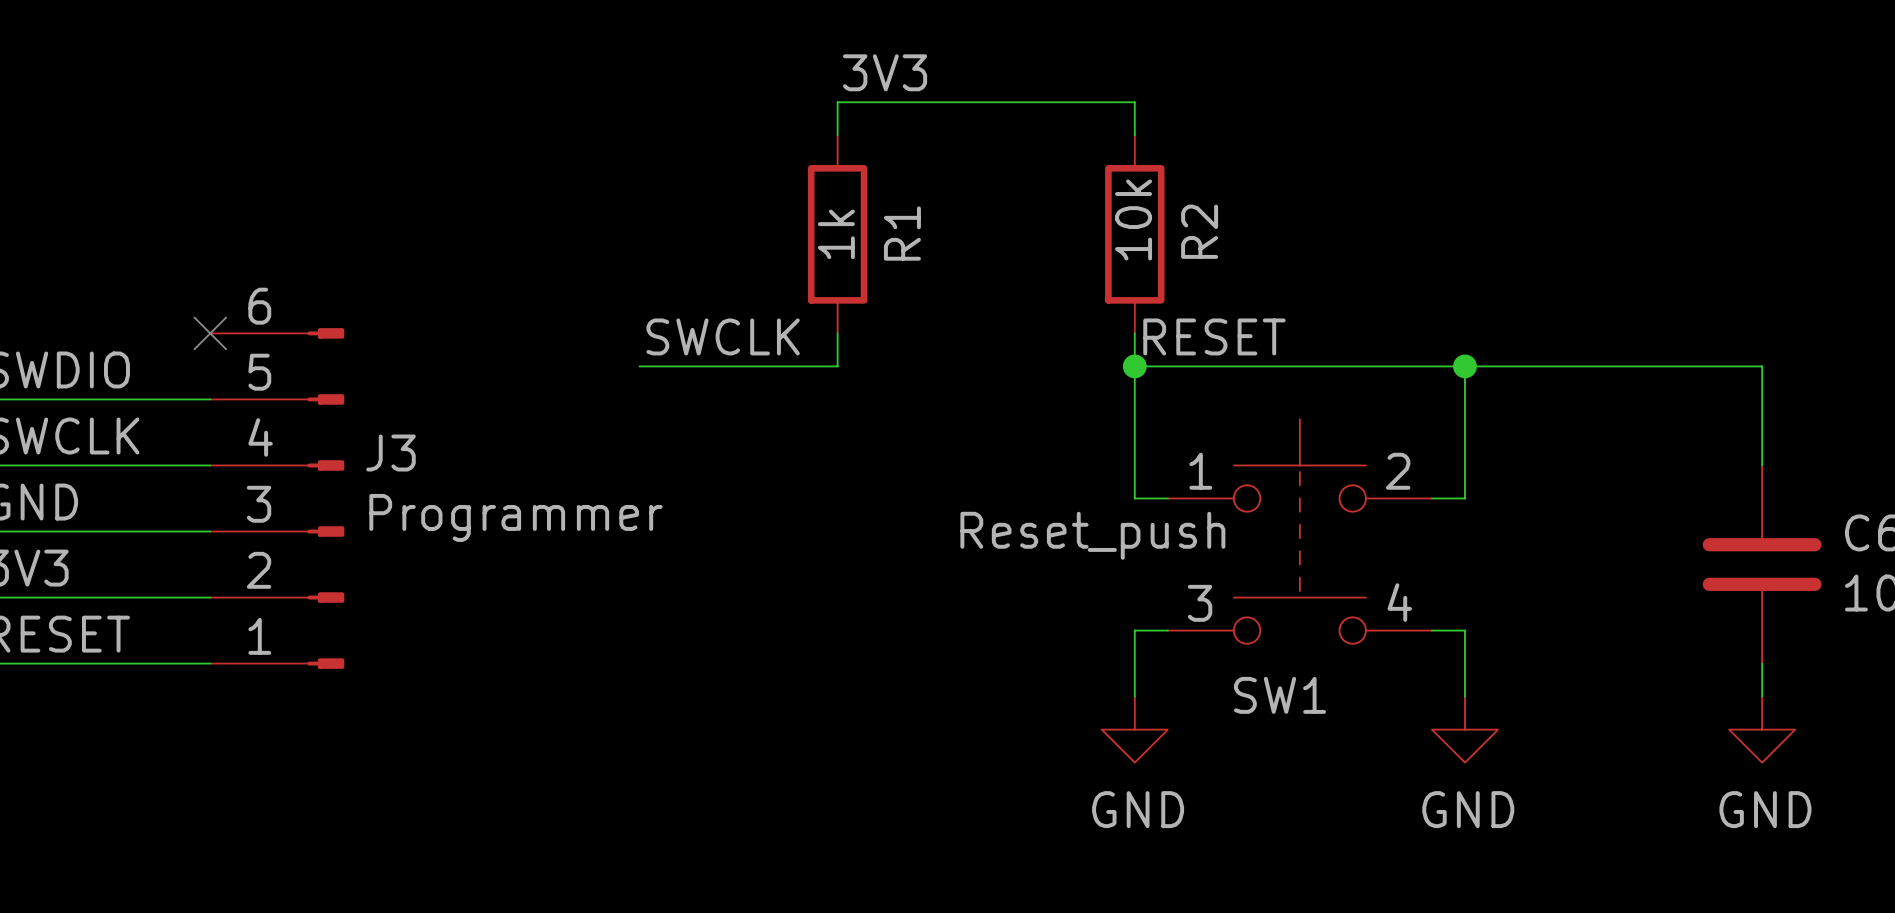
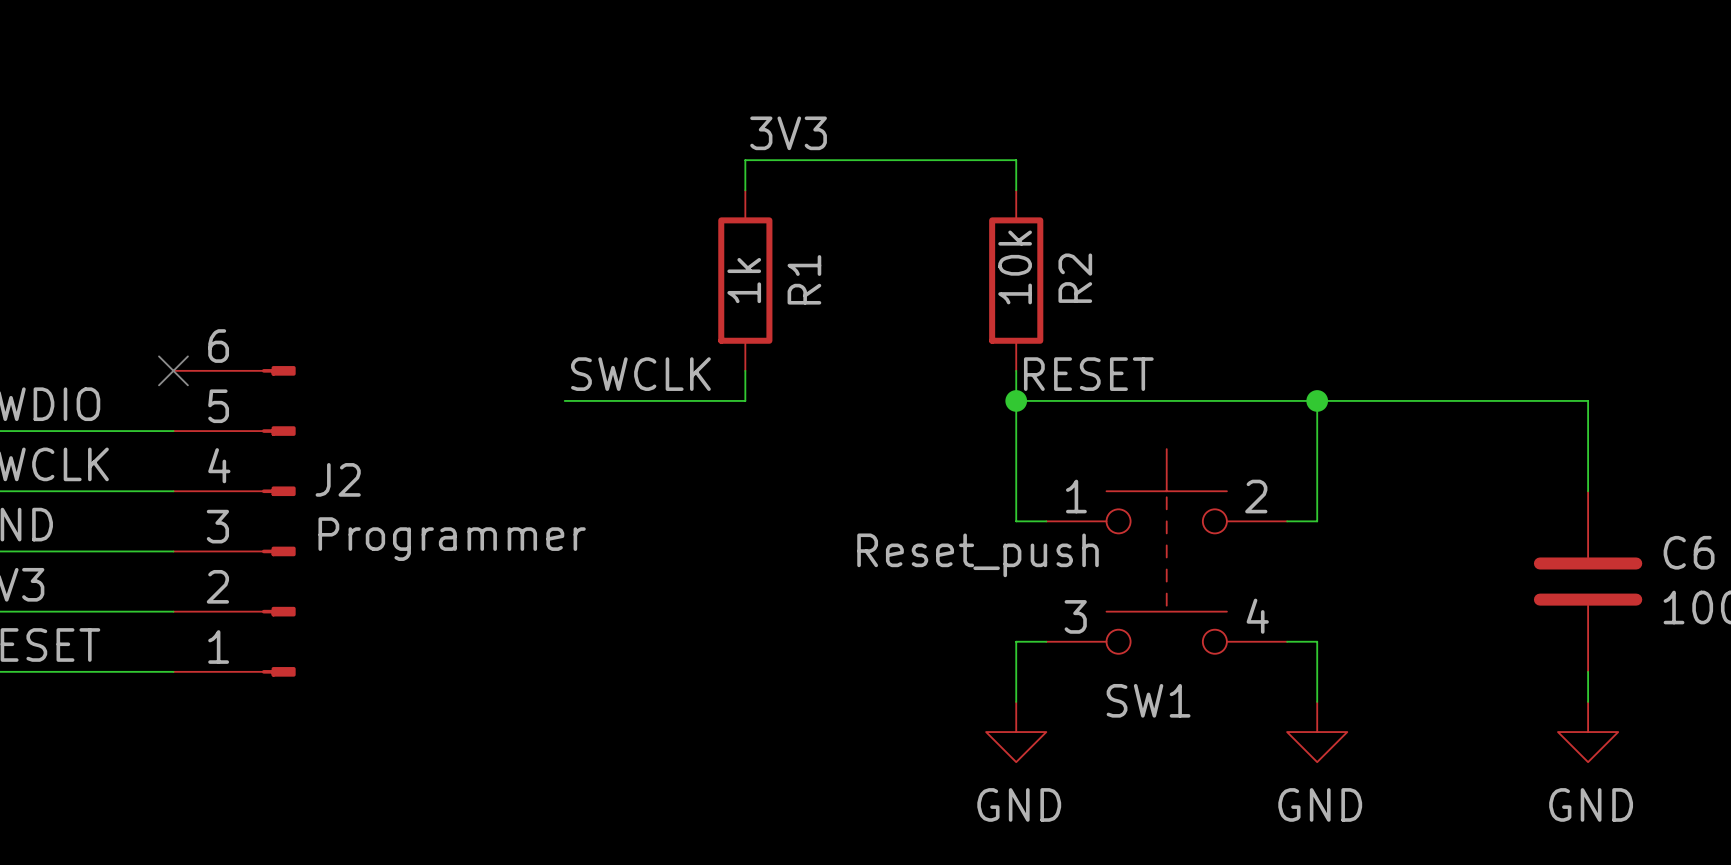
J3 name: J3 (390, 453) -> J2 (338, 479)

